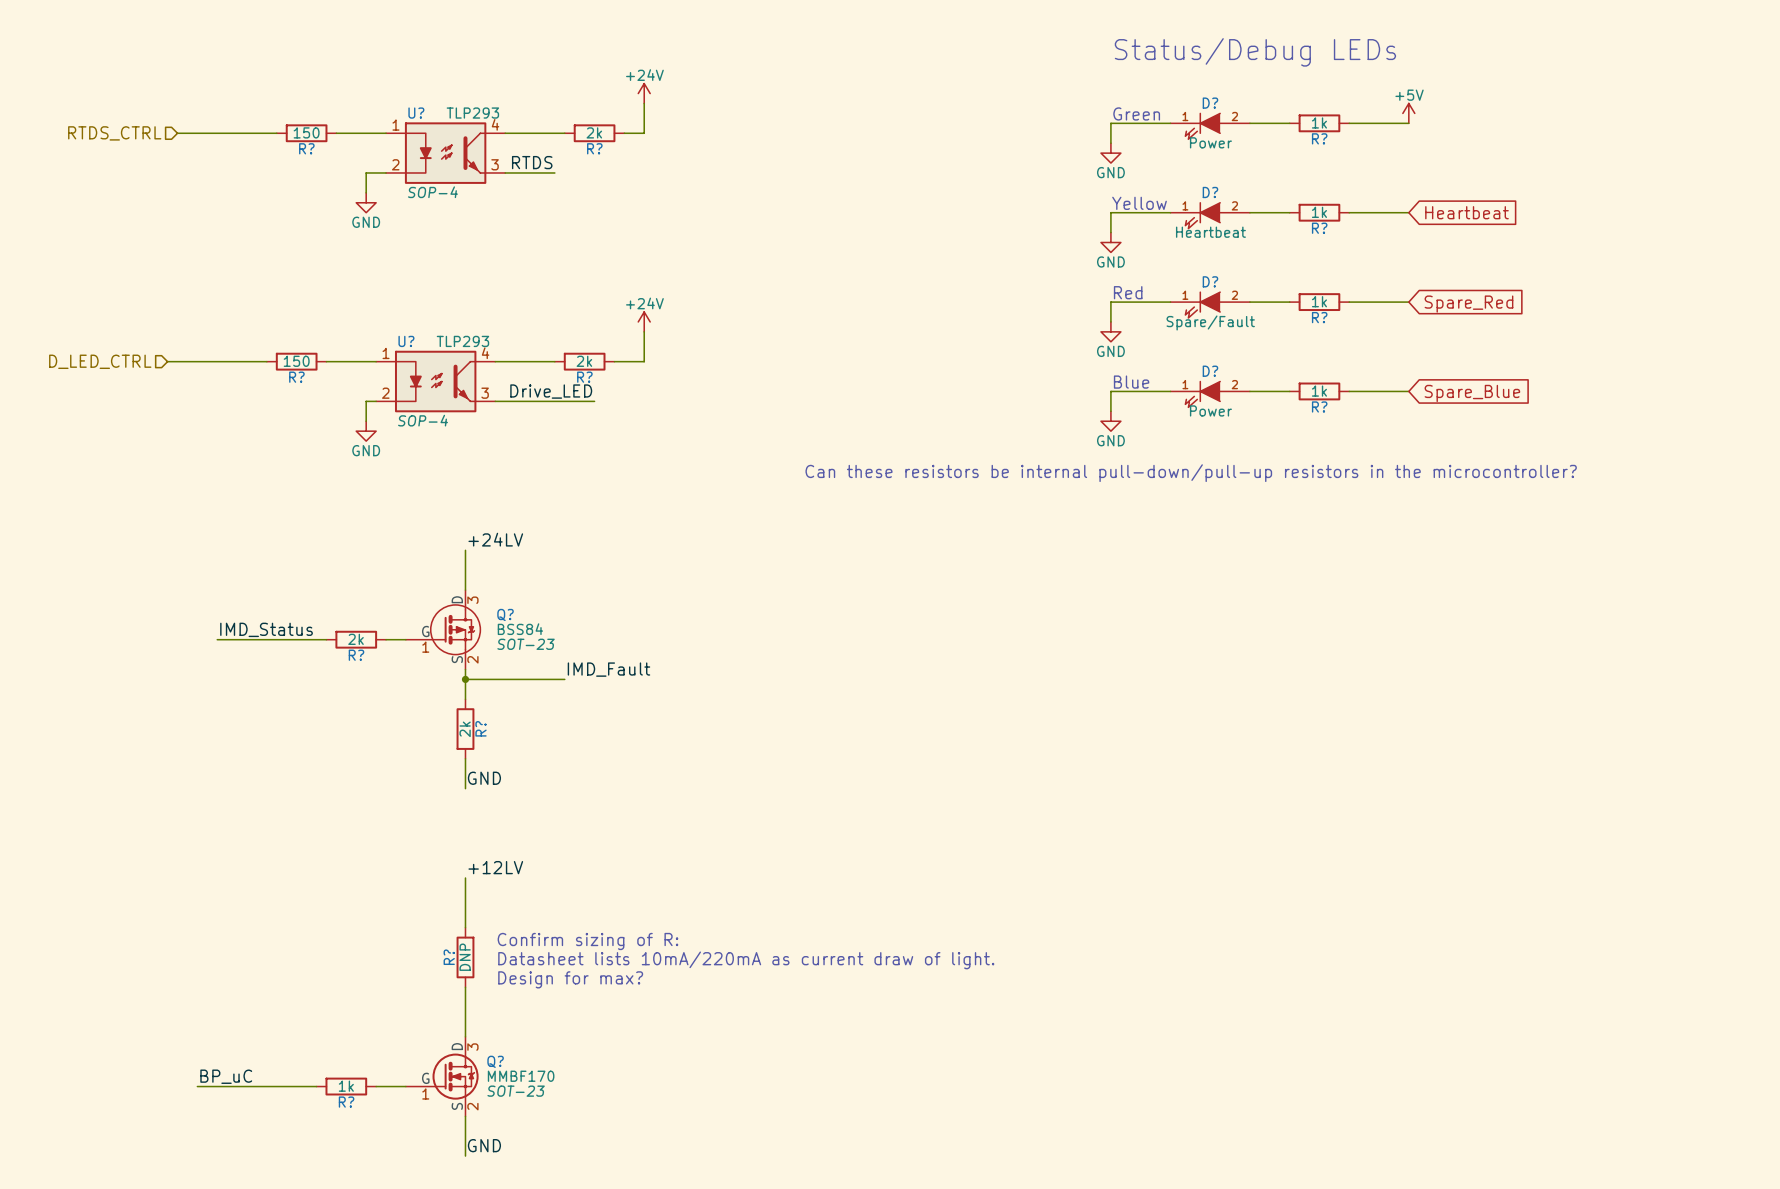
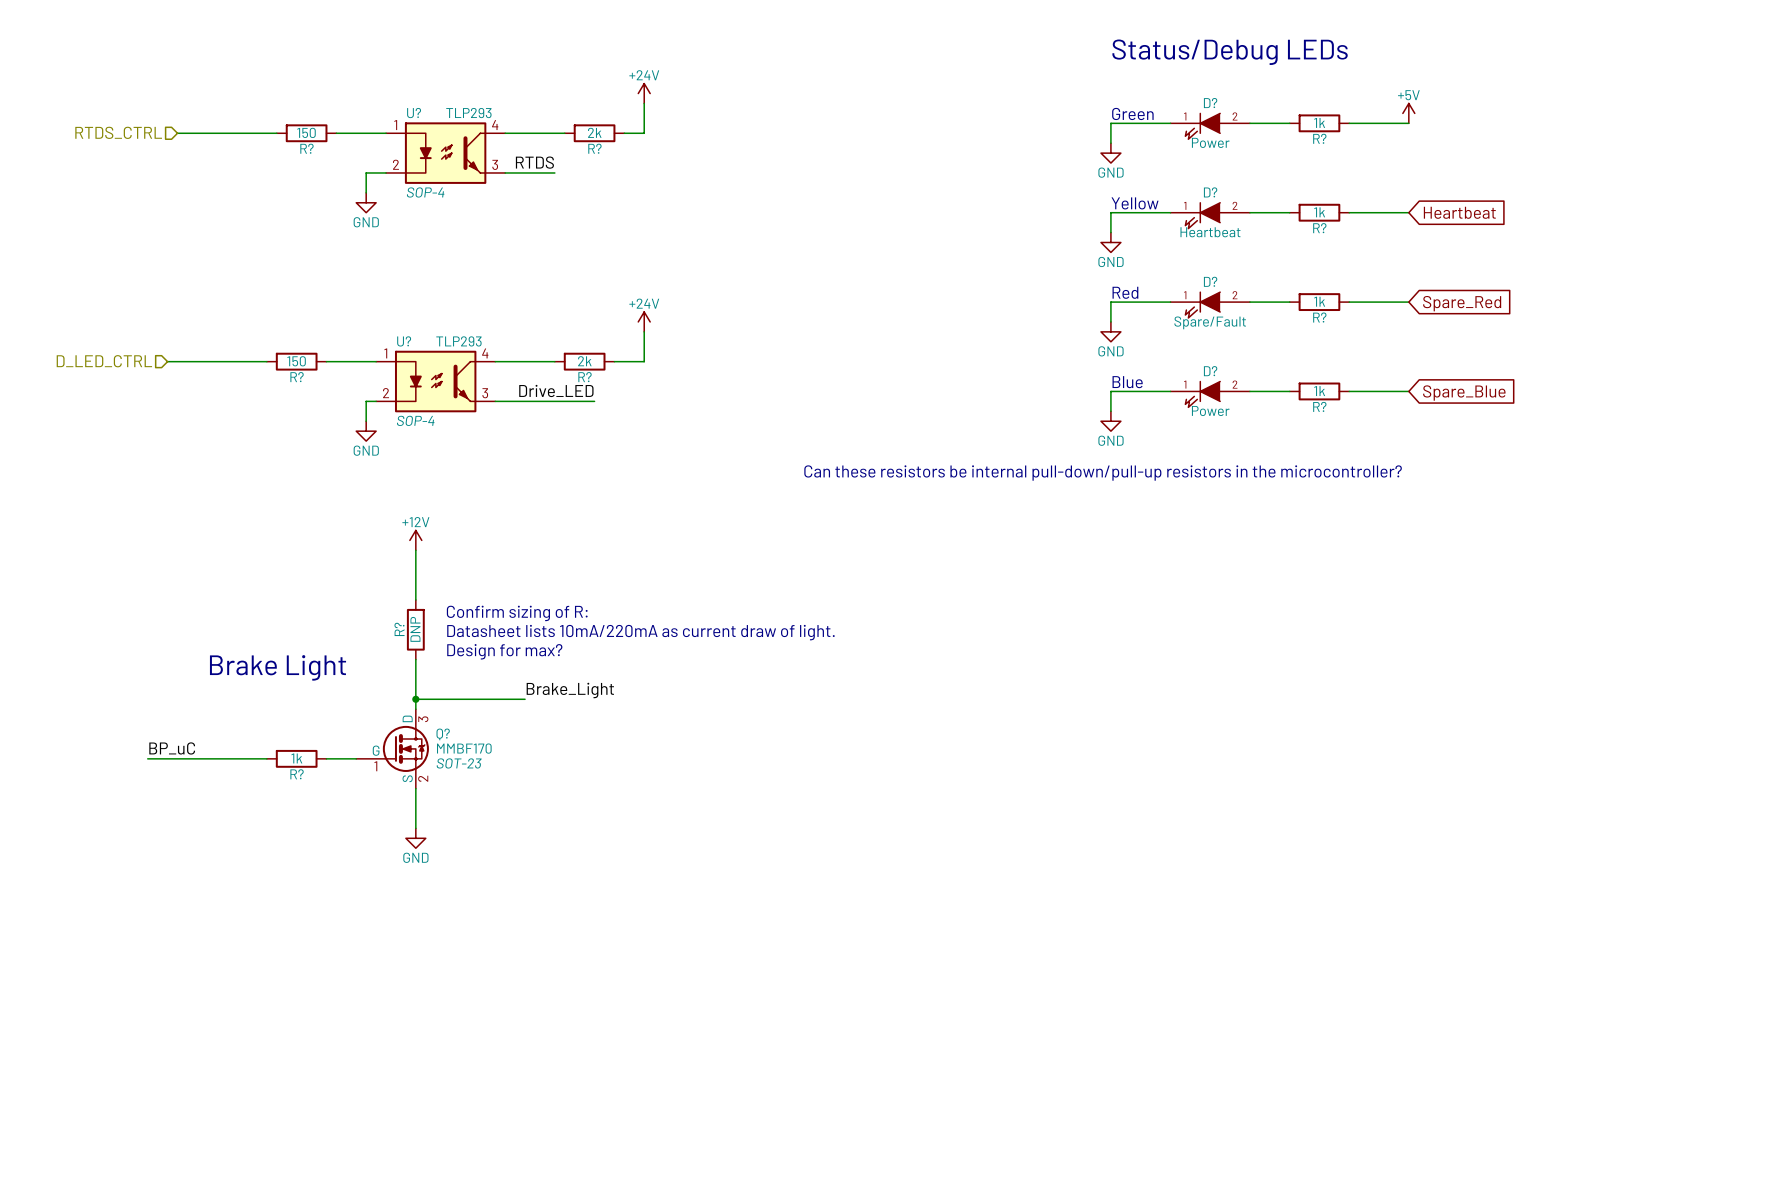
label: +24LV (495, 539) -> none
power symbol: none -> +12V (415, 540)
wire: none -> (415, 550) (415, 599)
wire: (465, 550) (465, 590) -> none
text: none -> Confirm sizing of R: (517, 613)
label: IMD_Status (266, 629) -> none
R?: none -> DNP (415, 629)
Q?: BSS84 (443, 629) -> none
text: none -> Datasheet lists 10mA/220mA as current draw of light. (640, 632)
wire: (217, 639) (326, 639) -> none
R?: 2k (356, 639) -> none
wire: (386, 639) (405, 639) -> none
text: none -> Design for max? (504, 651)
wire: none -> (415, 659) (415, 709)
text: none -> Brake Light (278, 667)
wire: (465, 669) (465, 699) -> none
label: IMD_Fault (608, 669) -> none
wire: (465, 679) (564, 679) -> none
junction: (465, 679) -> none
label: none -> Brake_Light (570, 690)
wire: none -> (415, 699) (525, 699)
junction: none -> (415, 699)
R?: 2k (465, 729) -> none
Q?: none -> MMBF170 (392, 748)
label: none -> BP_uC (172, 748)
wire: none -> (147, 758) (266, 758)
R?: none -> 1k (296, 758)
wire: none -> (326, 758) (356, 758)
wire: (465, 758) (465, 788) -> none
label: GND (484, 778) -> none
wire: none -> (415, 788) (415, 828)
power symbol: none -> GND (415, 838)
label: +12LV (495, 867) -> none
wire: (465, 878) (465, 927) -> none
text: Confirm sizing of R: (587, 941) -> none
R?: DNP (465, 957) -> none
text: Datasheet lists 10mA/220mA as current draw of light. (746, 960) -> none
text: Design for max? (570, 979) -> none
wire: (465, 987) (465, 1036) -> none
label: BP_uC (226, 1076) -> none
Q?: MMBF170 (442, 1076) -> none
wire: (197, 1086) (316, 1086) -> none
R?: 1k (346, 1086) -> none
wire: (376, 1086) (405, 1086) -> none
wire: (465, 1116) (465, 1156) -> none
label: GND (484, 1145) -> none

